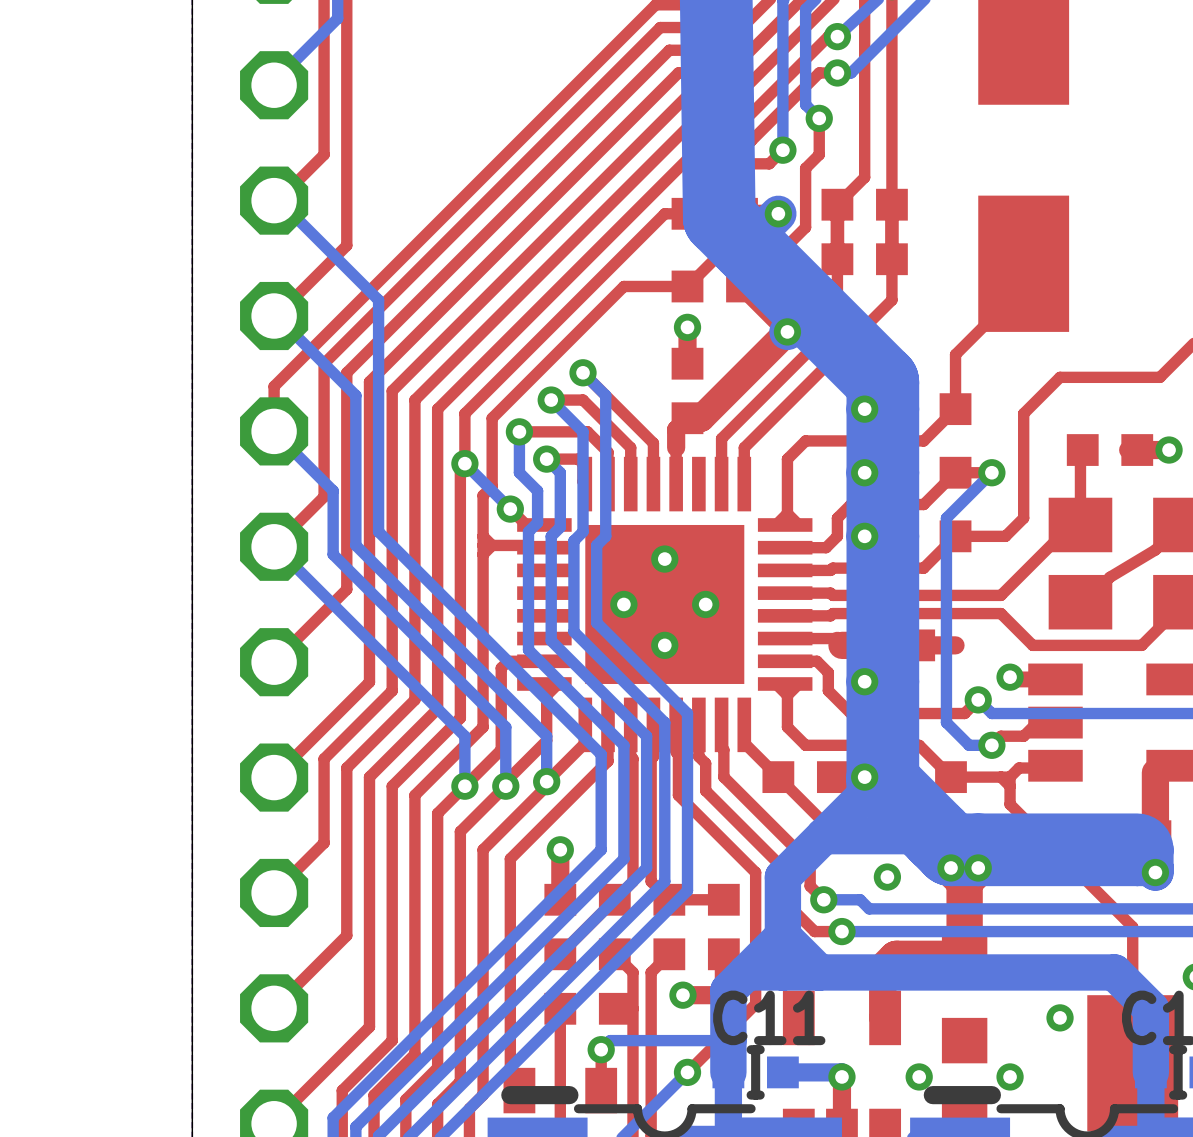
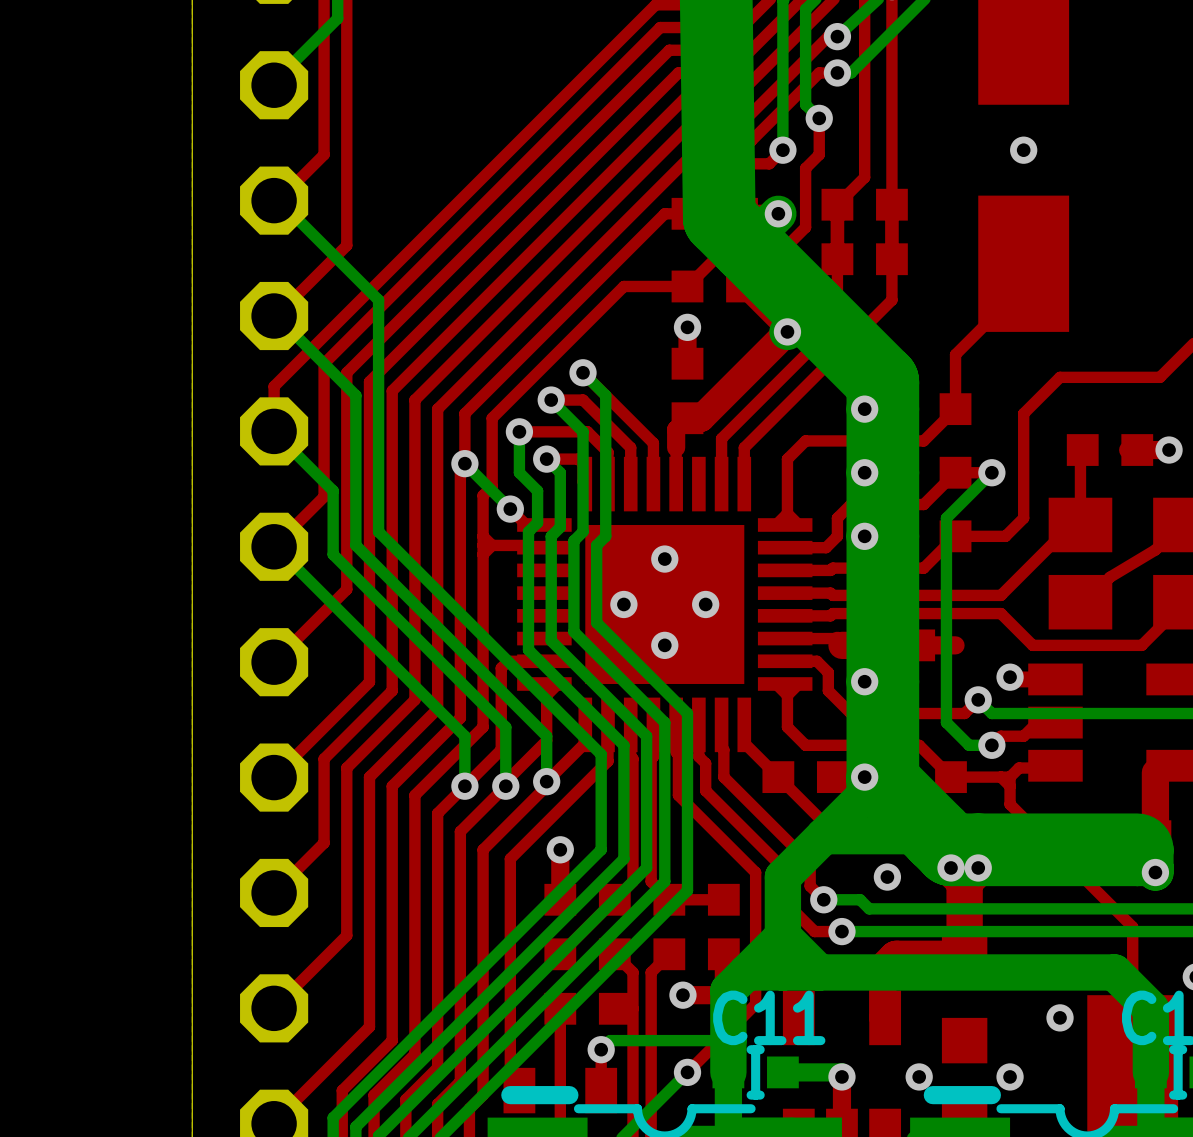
via: none -> (1023, 150)

